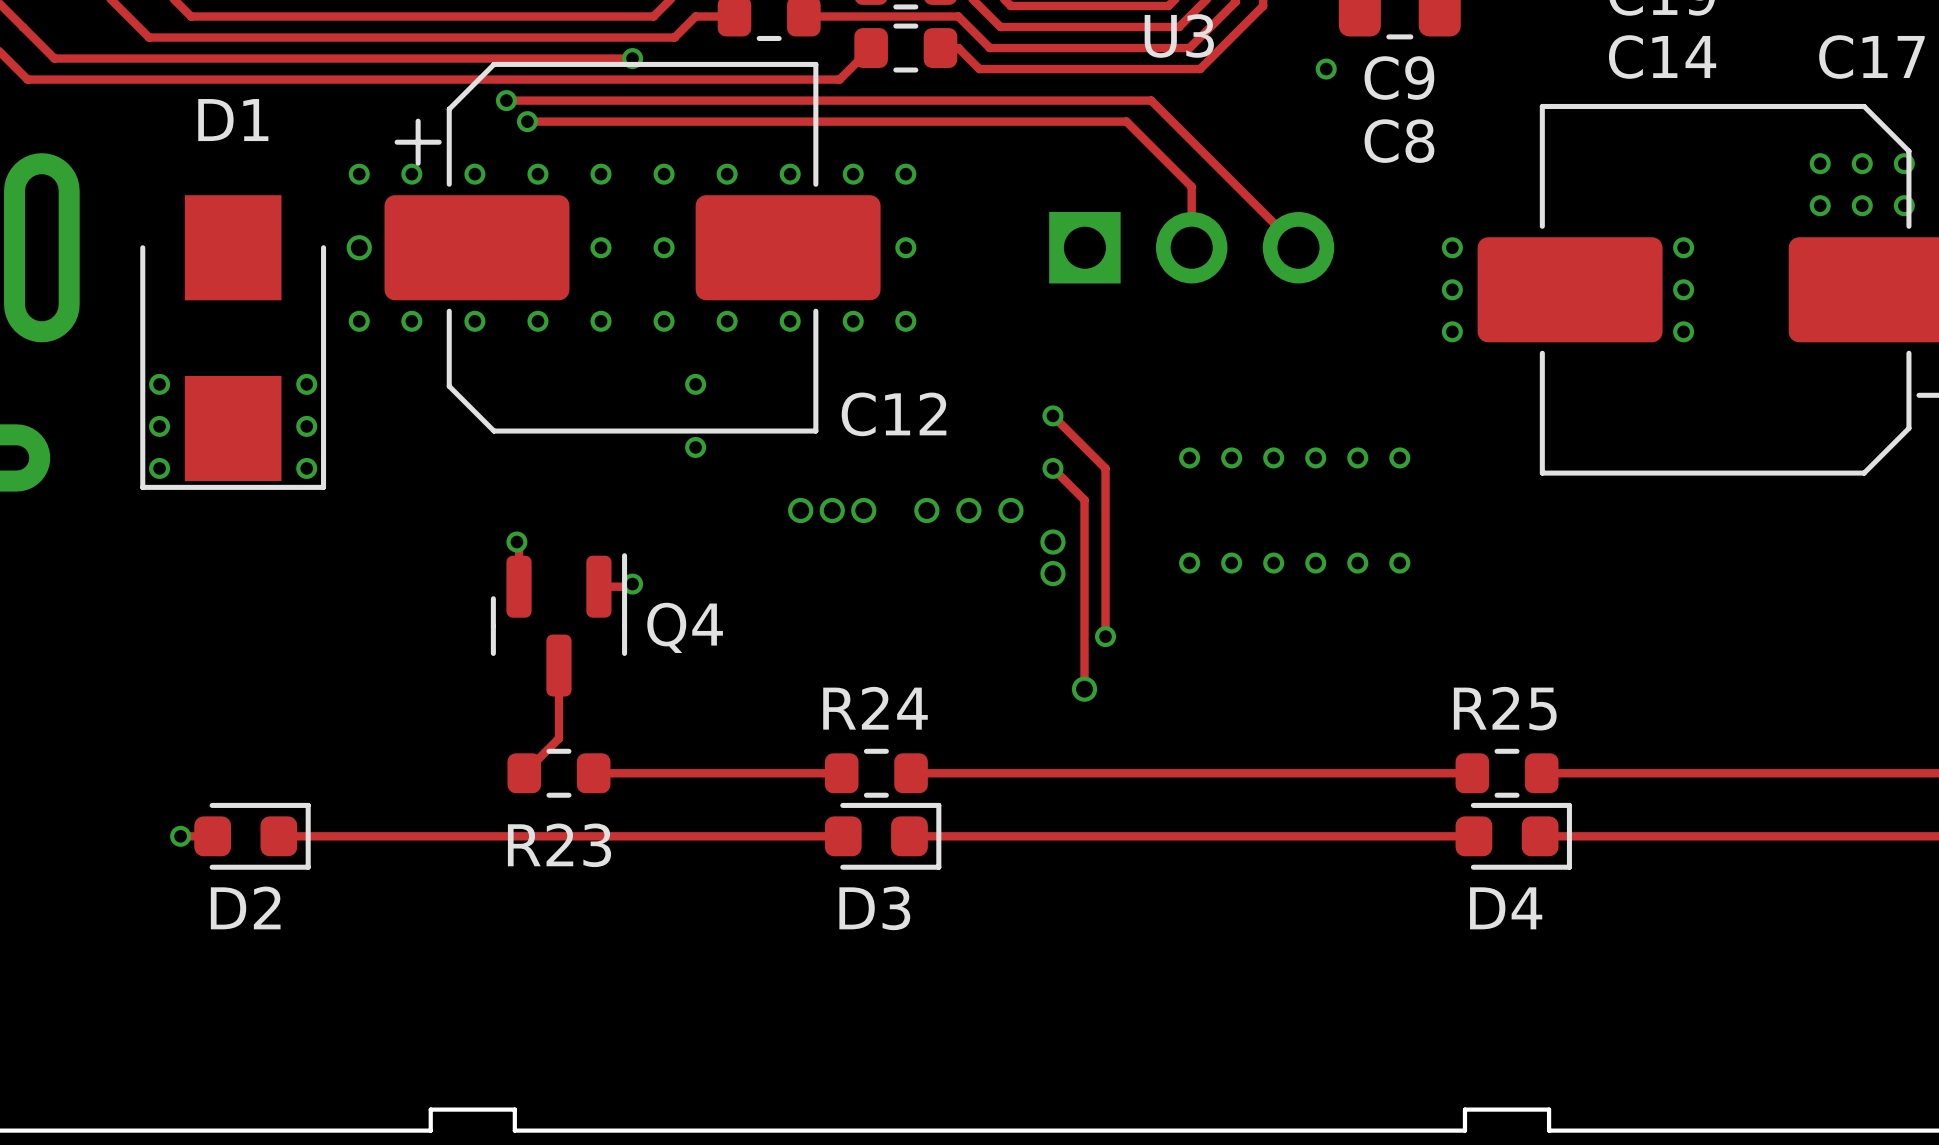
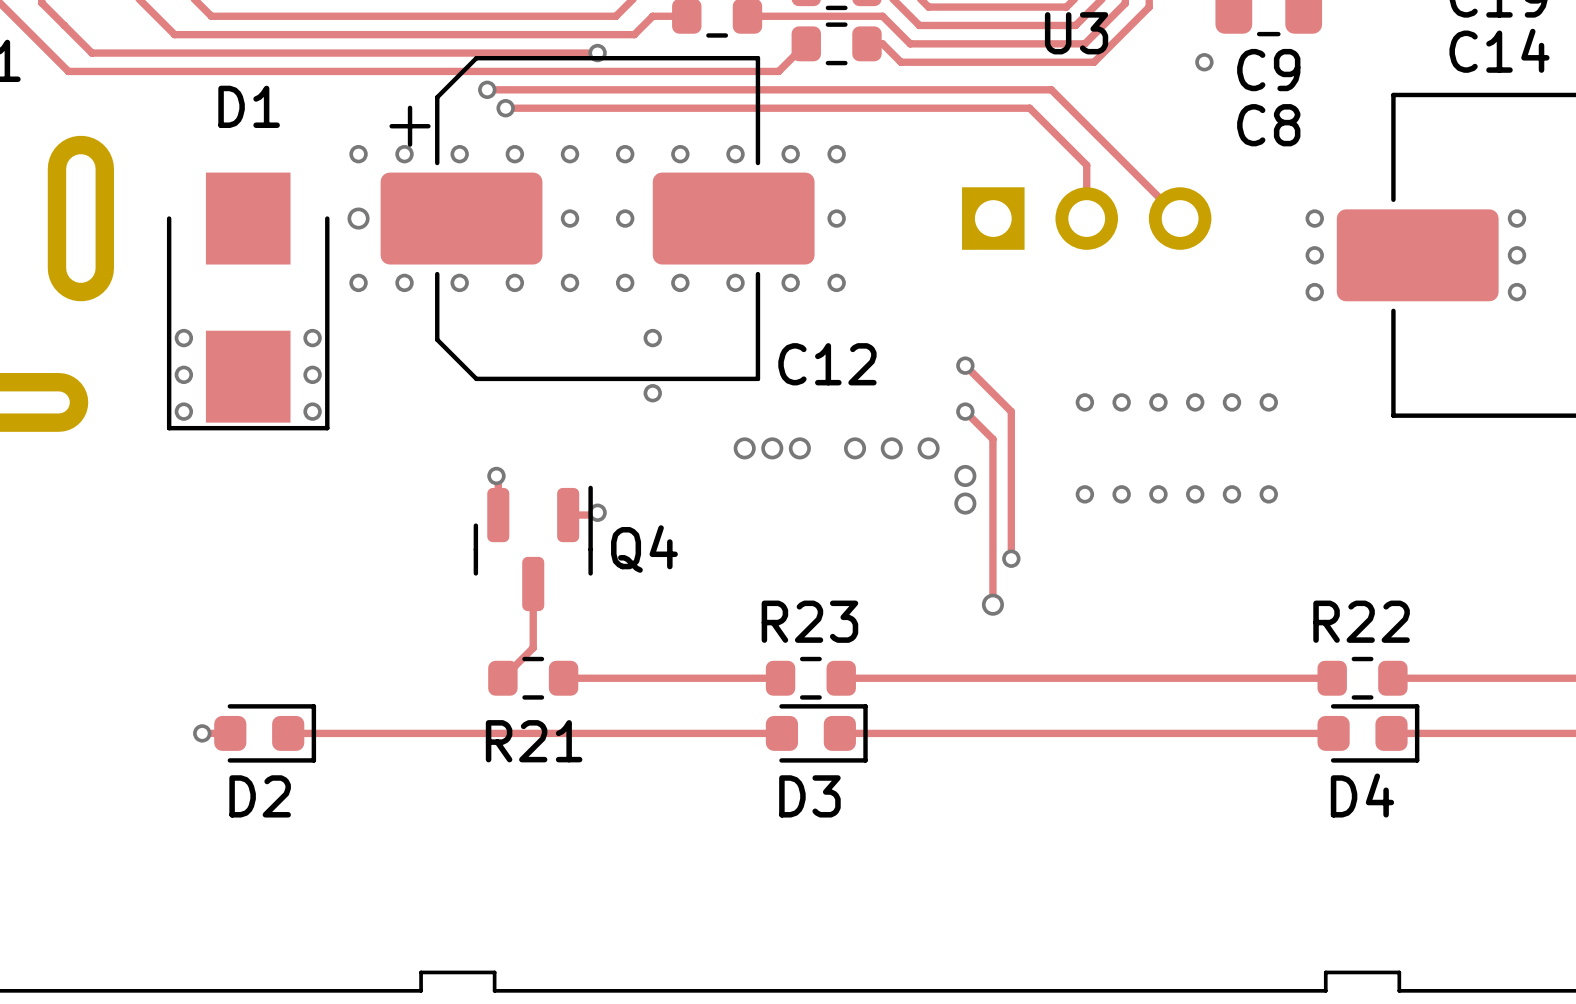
R24 name: R24 (875, 708) -> R23 (809, 621)
R25 name: R25 (1505, 708) -> R22 (1361, 621)
R23 name: R23 (559, 845) -> R21 (534, 741)

